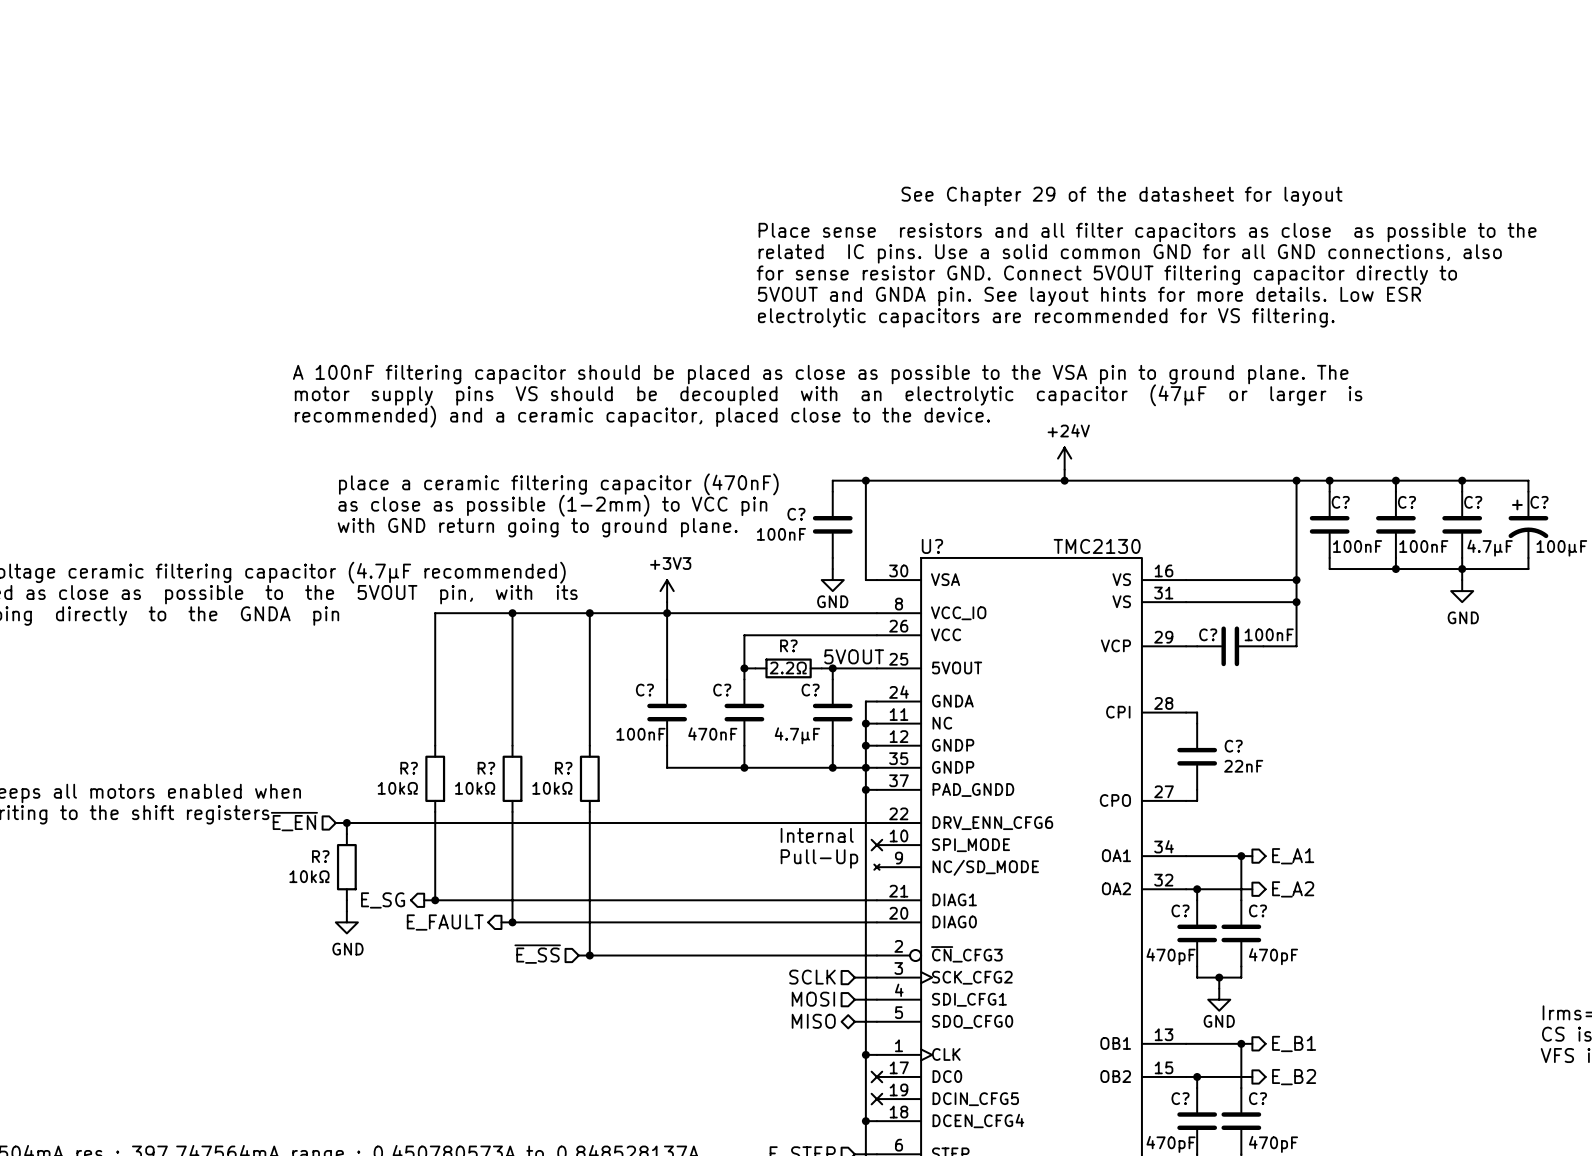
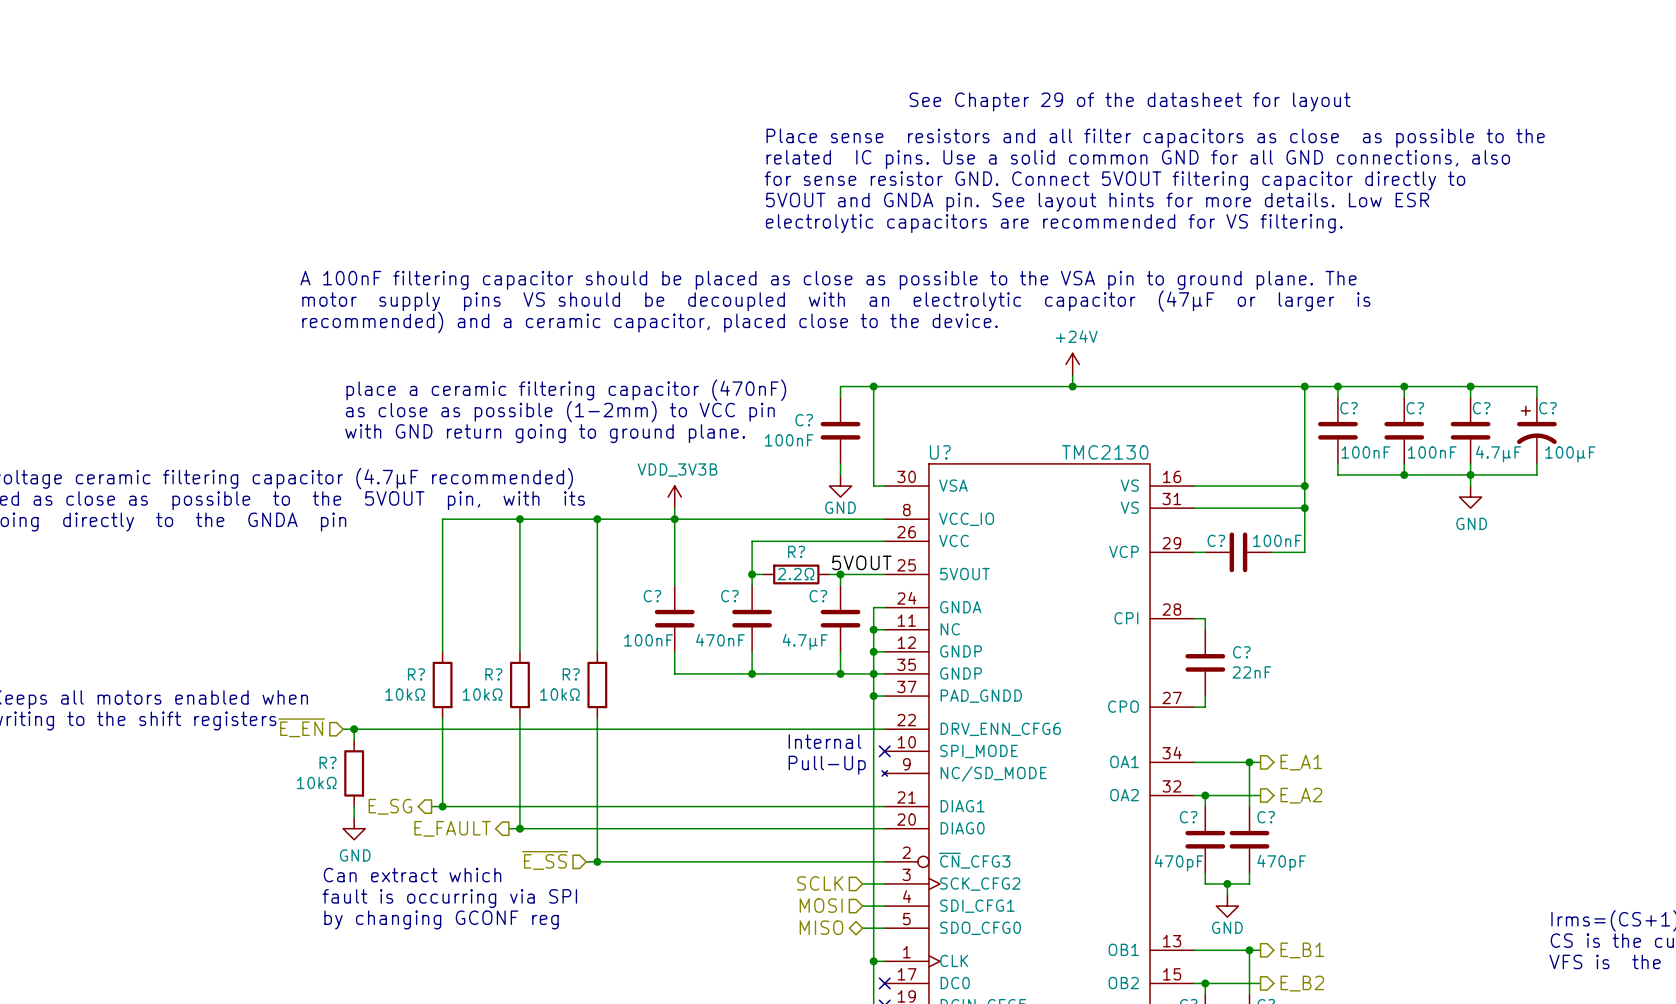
power symbol: +3V3 (667, 591) -> VDD_3V3B (674, 497)
text: none -> Can extract which (412, 875)
text: none -> fault is occurring via SPI (449, 898)
text: none -> by changing GCONF reg (441, 919)

